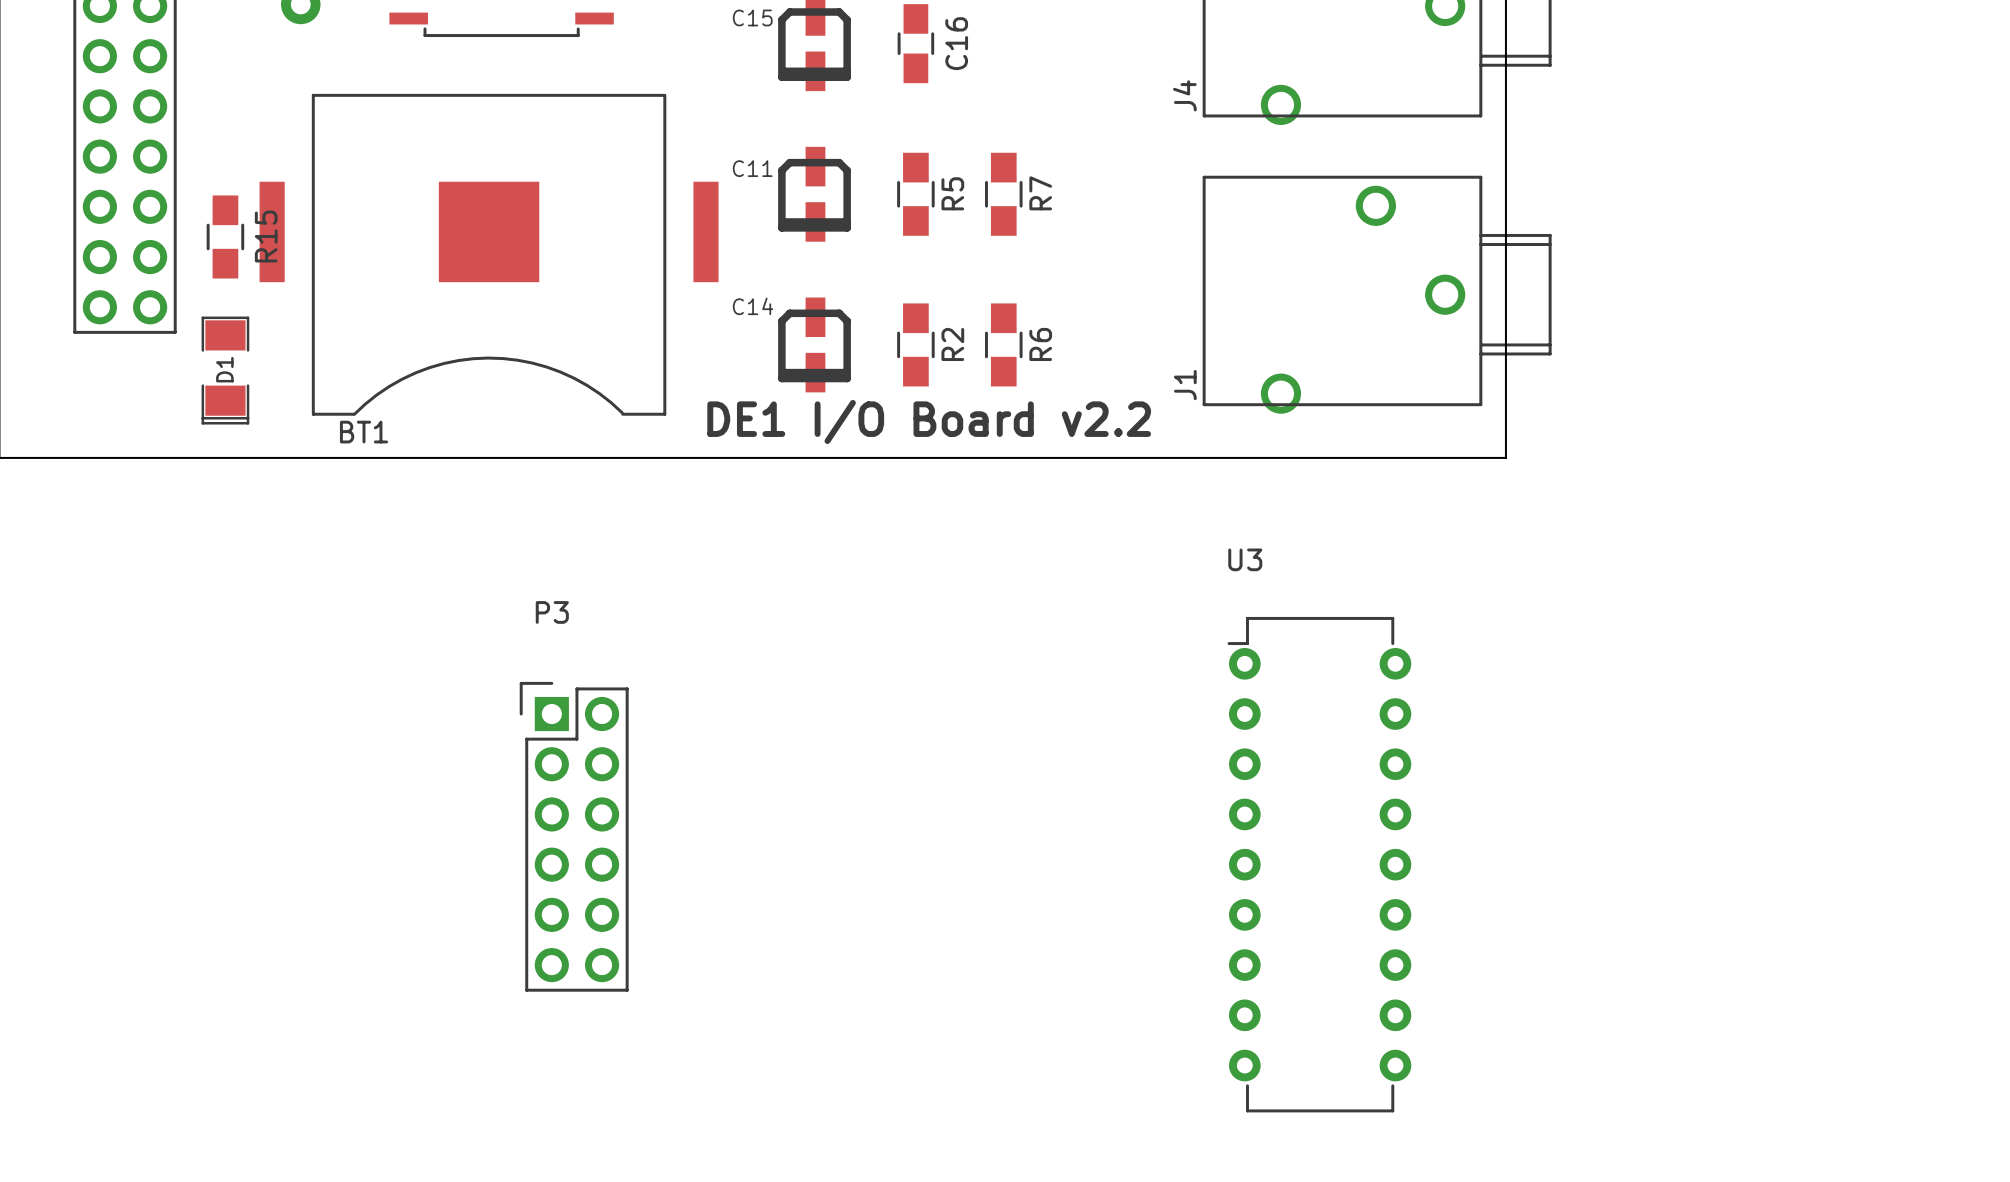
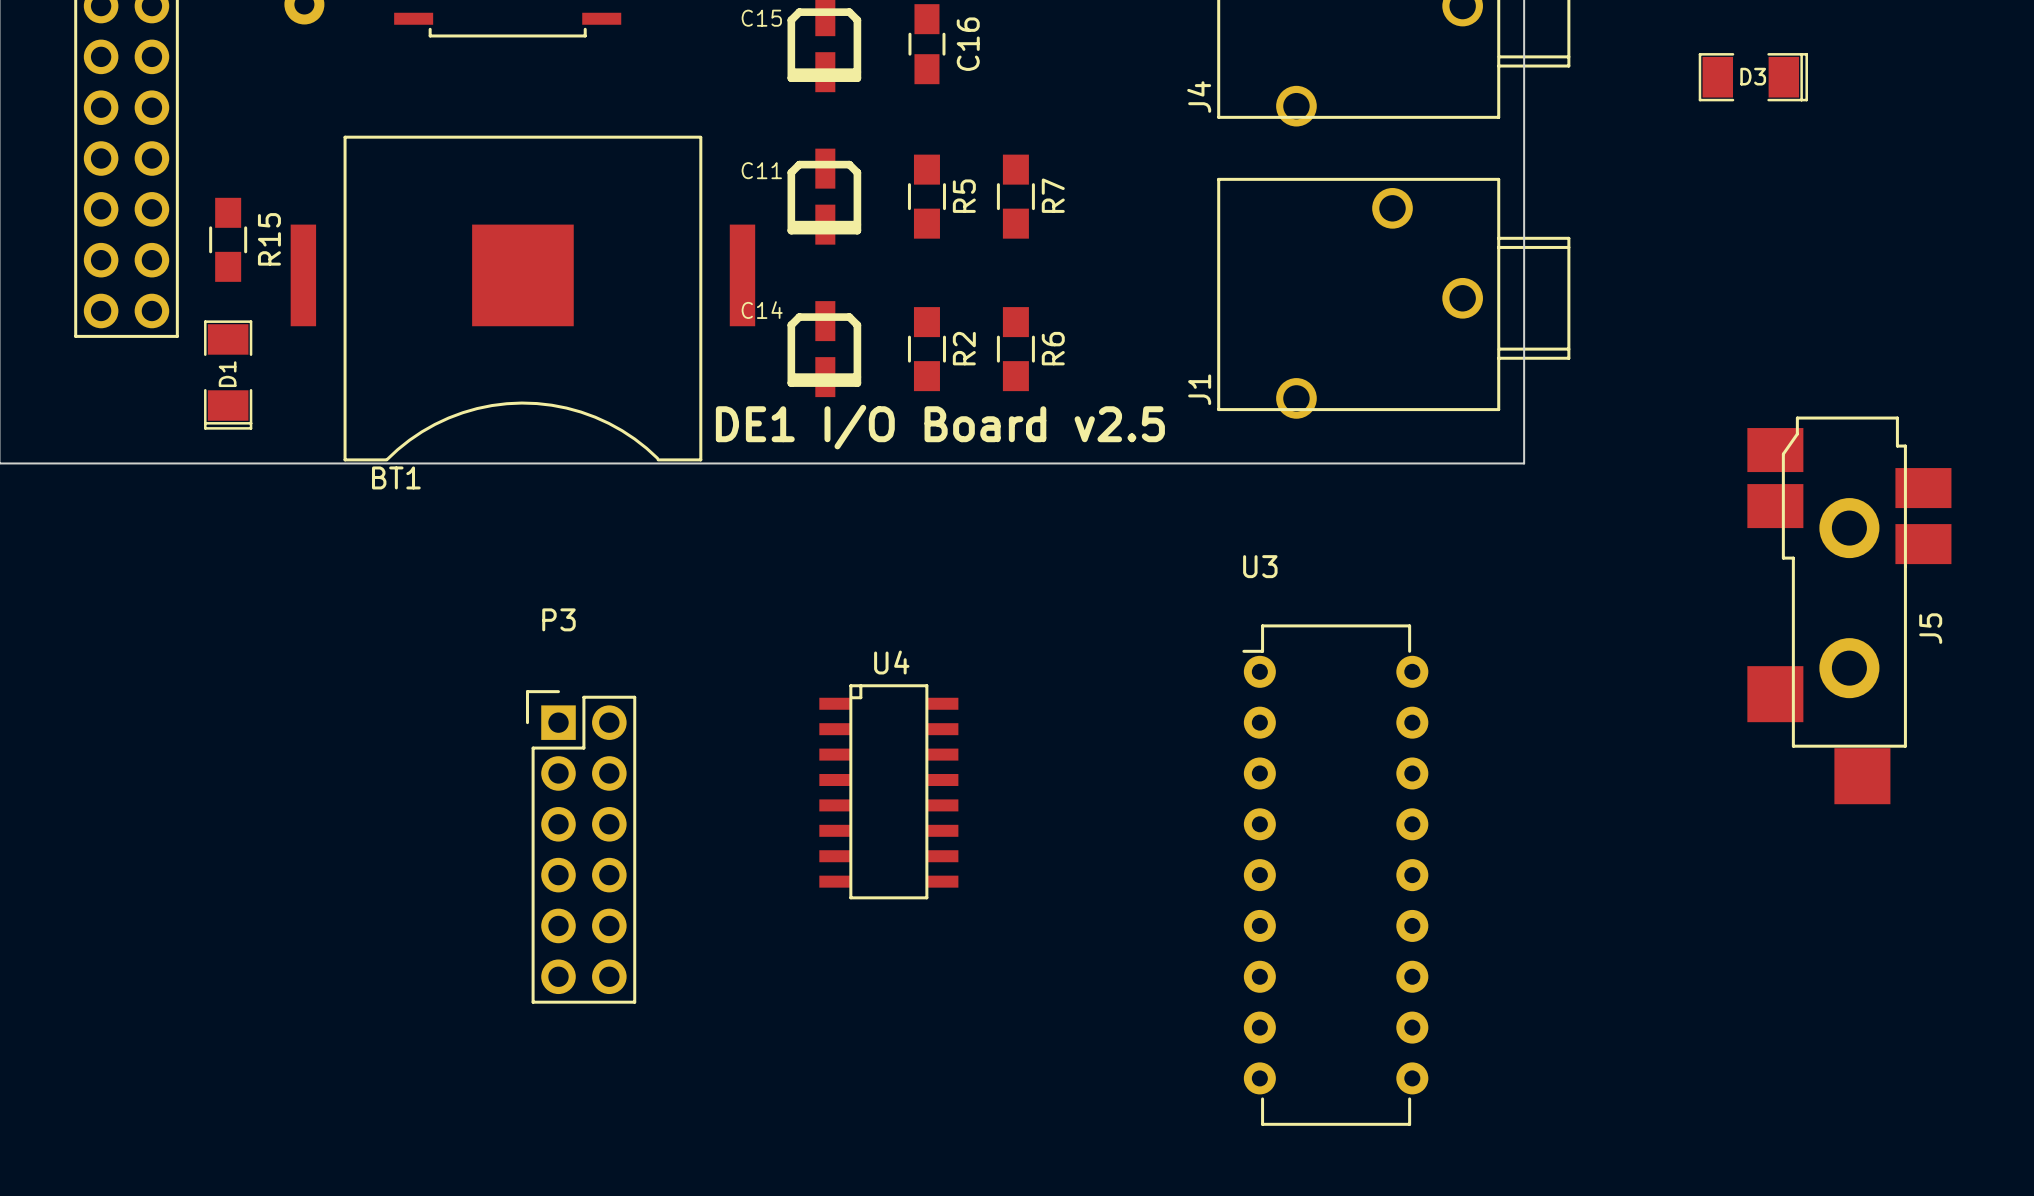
D3: none -> (1753, 77)
BT1 position: (489, 254) -> (522, 298)
text: DE1 I/O Board v2.2 (929, 421) -> DE1 I/O Board v2.5 (940, 427)
J5: none -> (1849, 610)
U4: none -> (888, 791)

